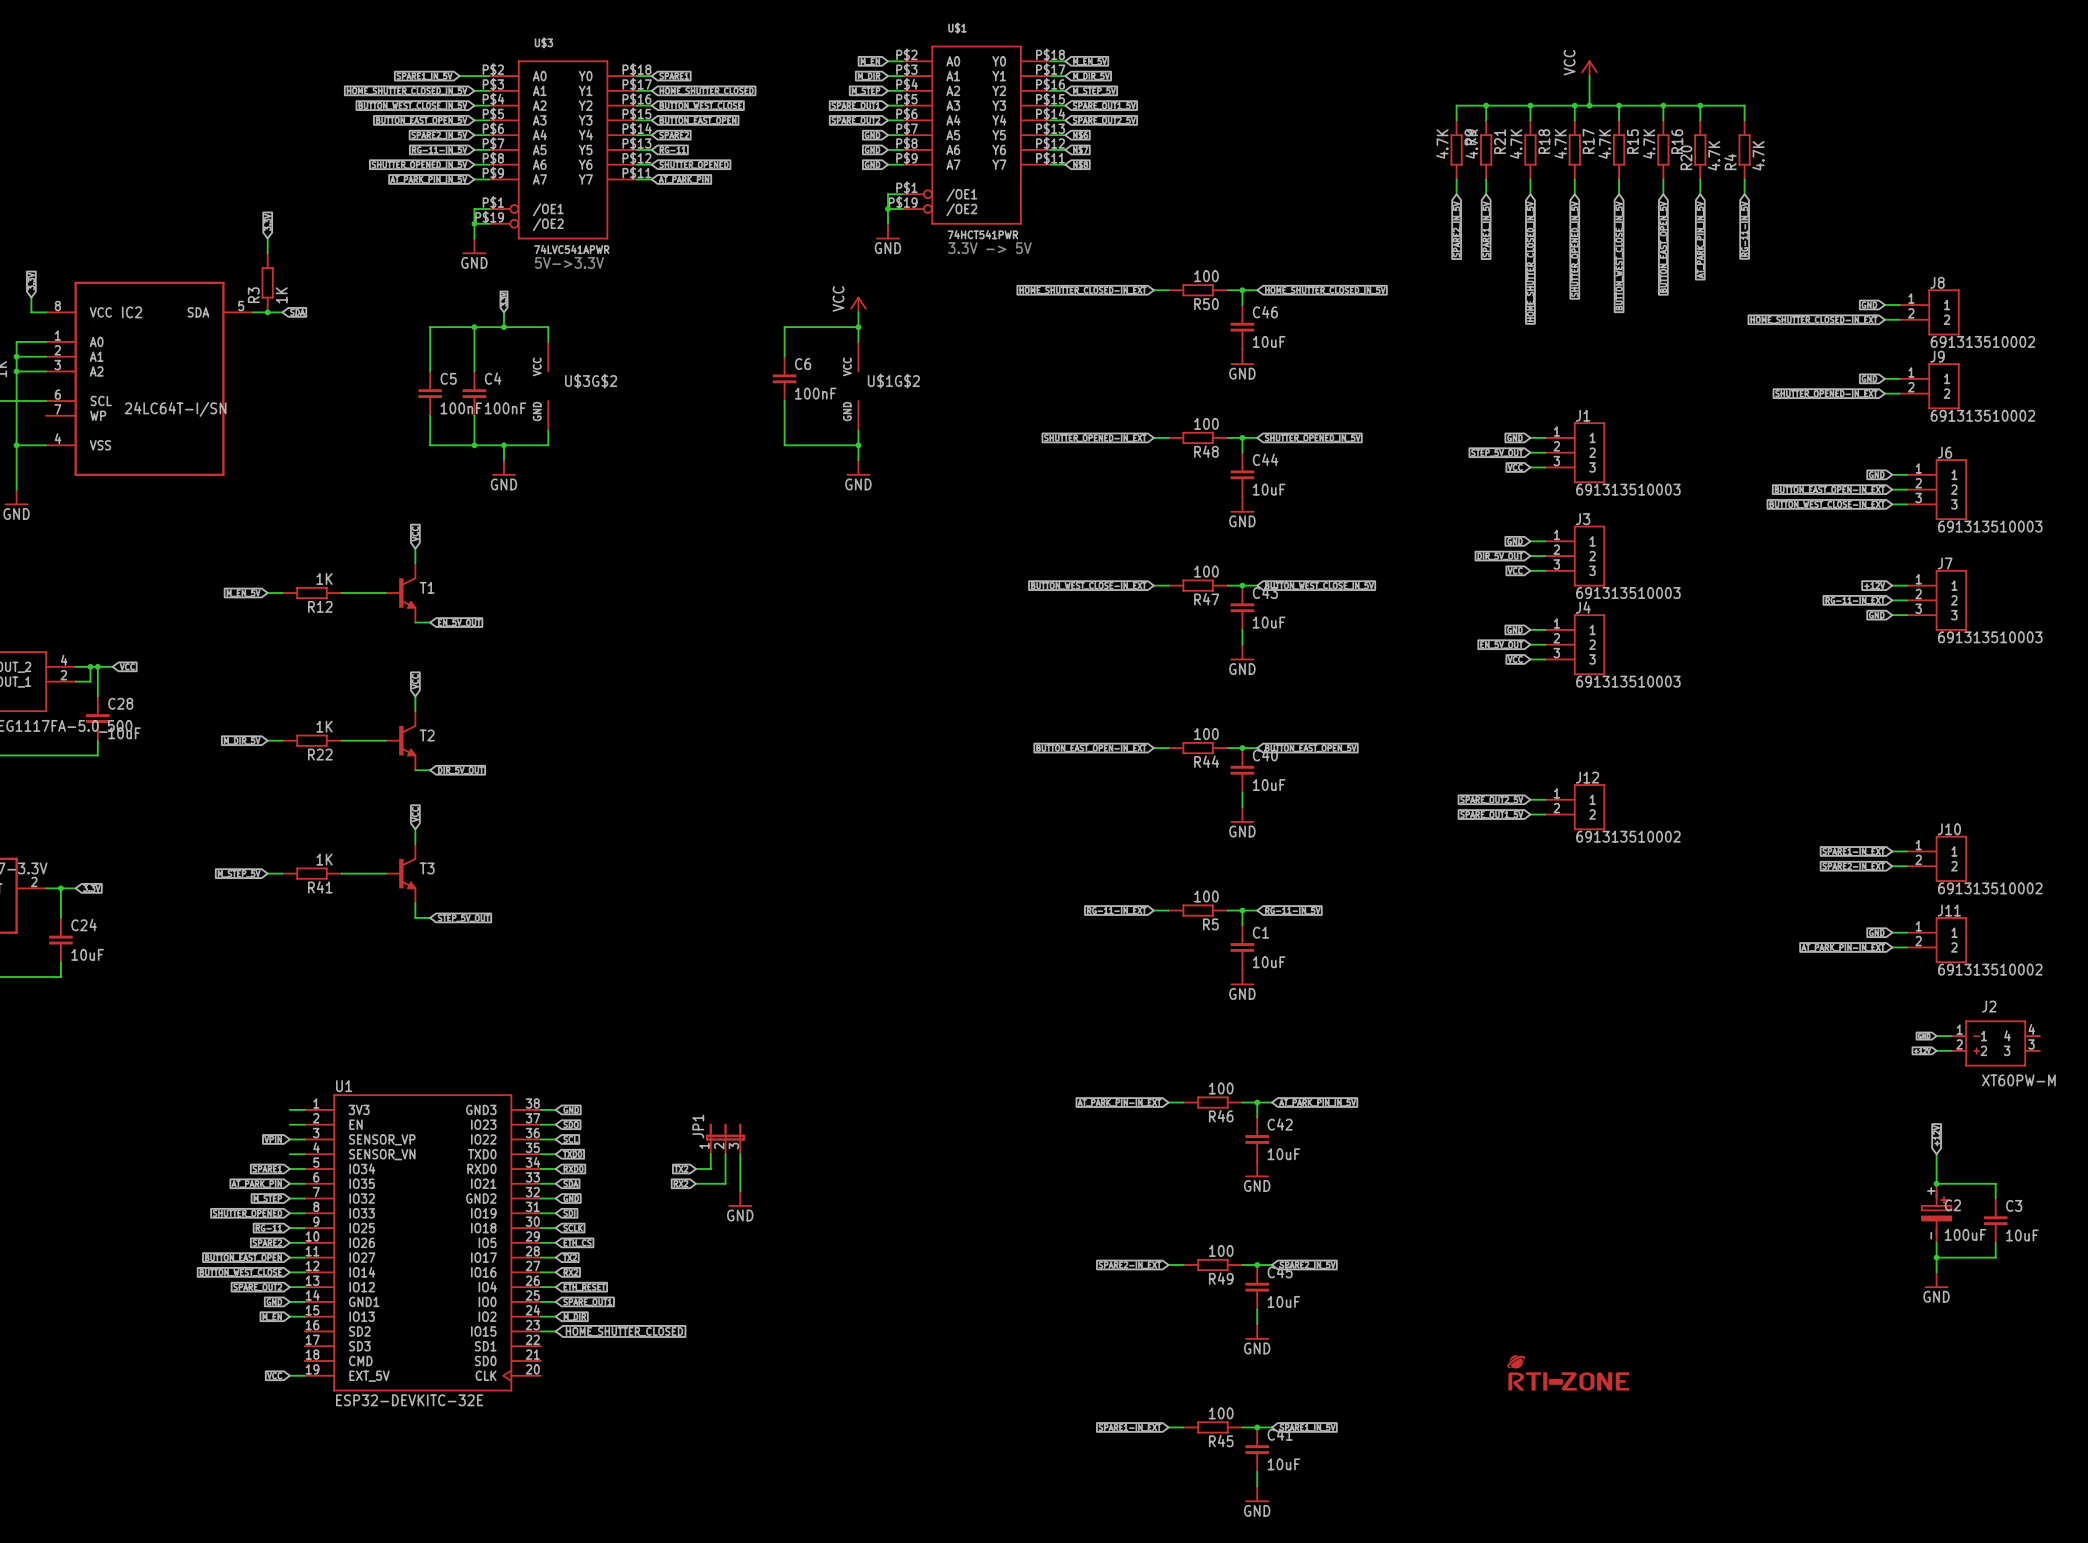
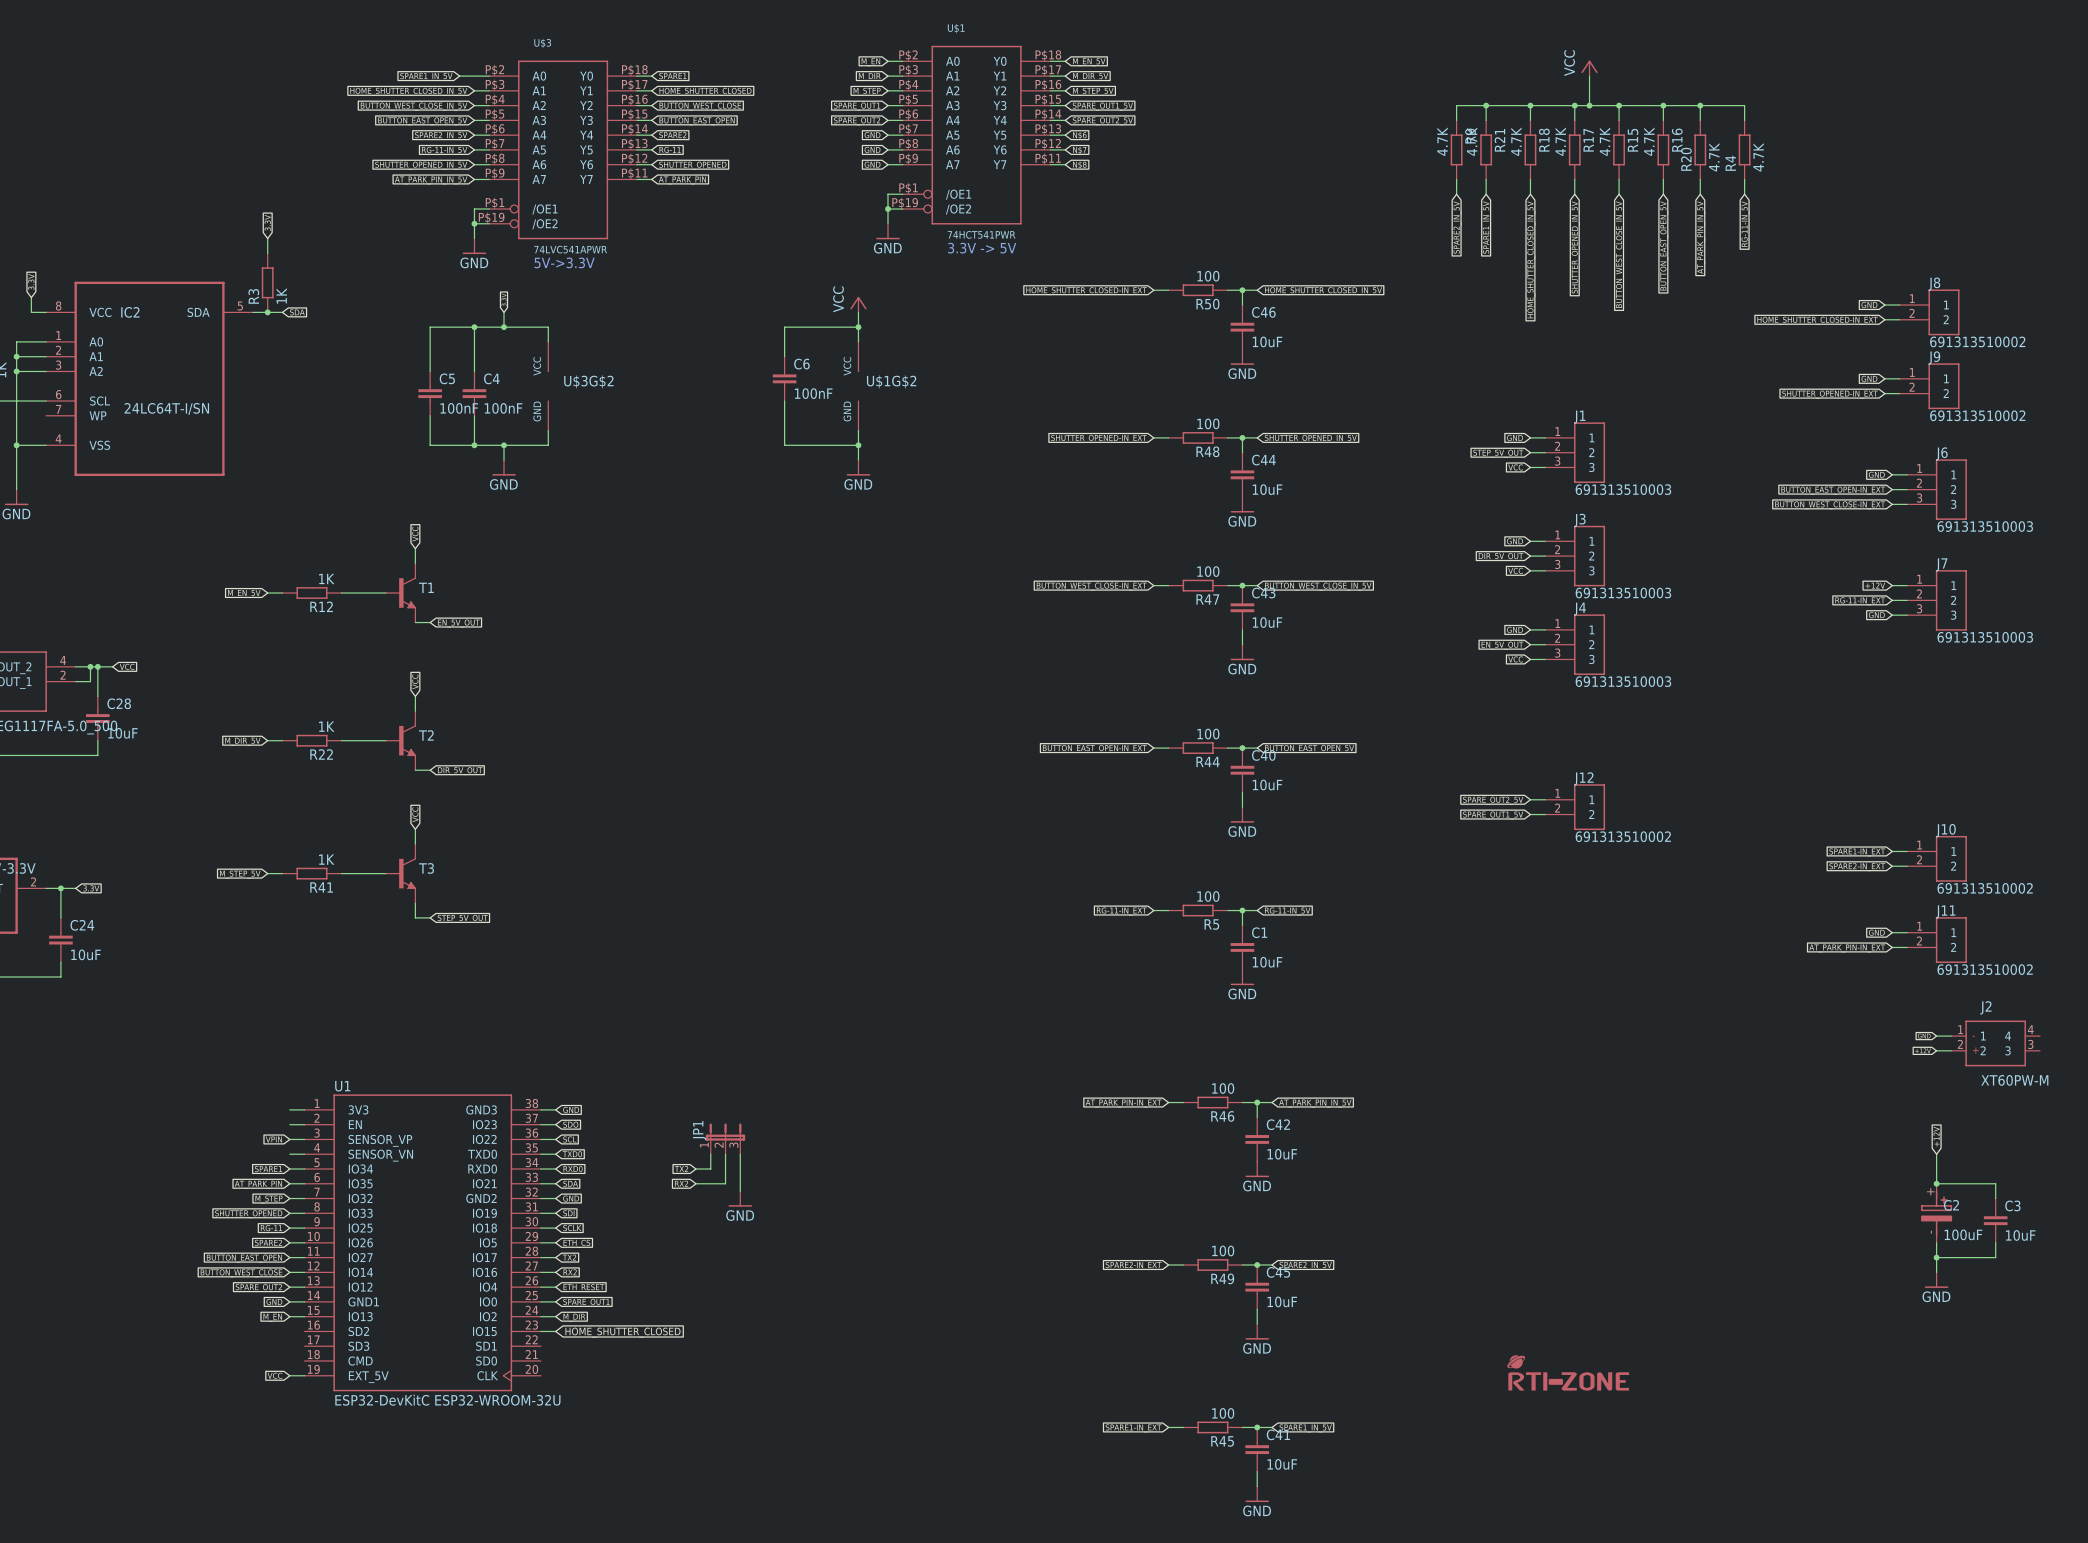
U1 value: ESP32-DEVKITC-32E (409, 1400) -> ESP32-DevKitC ESP32-WROOM-32U (447, 1400)

